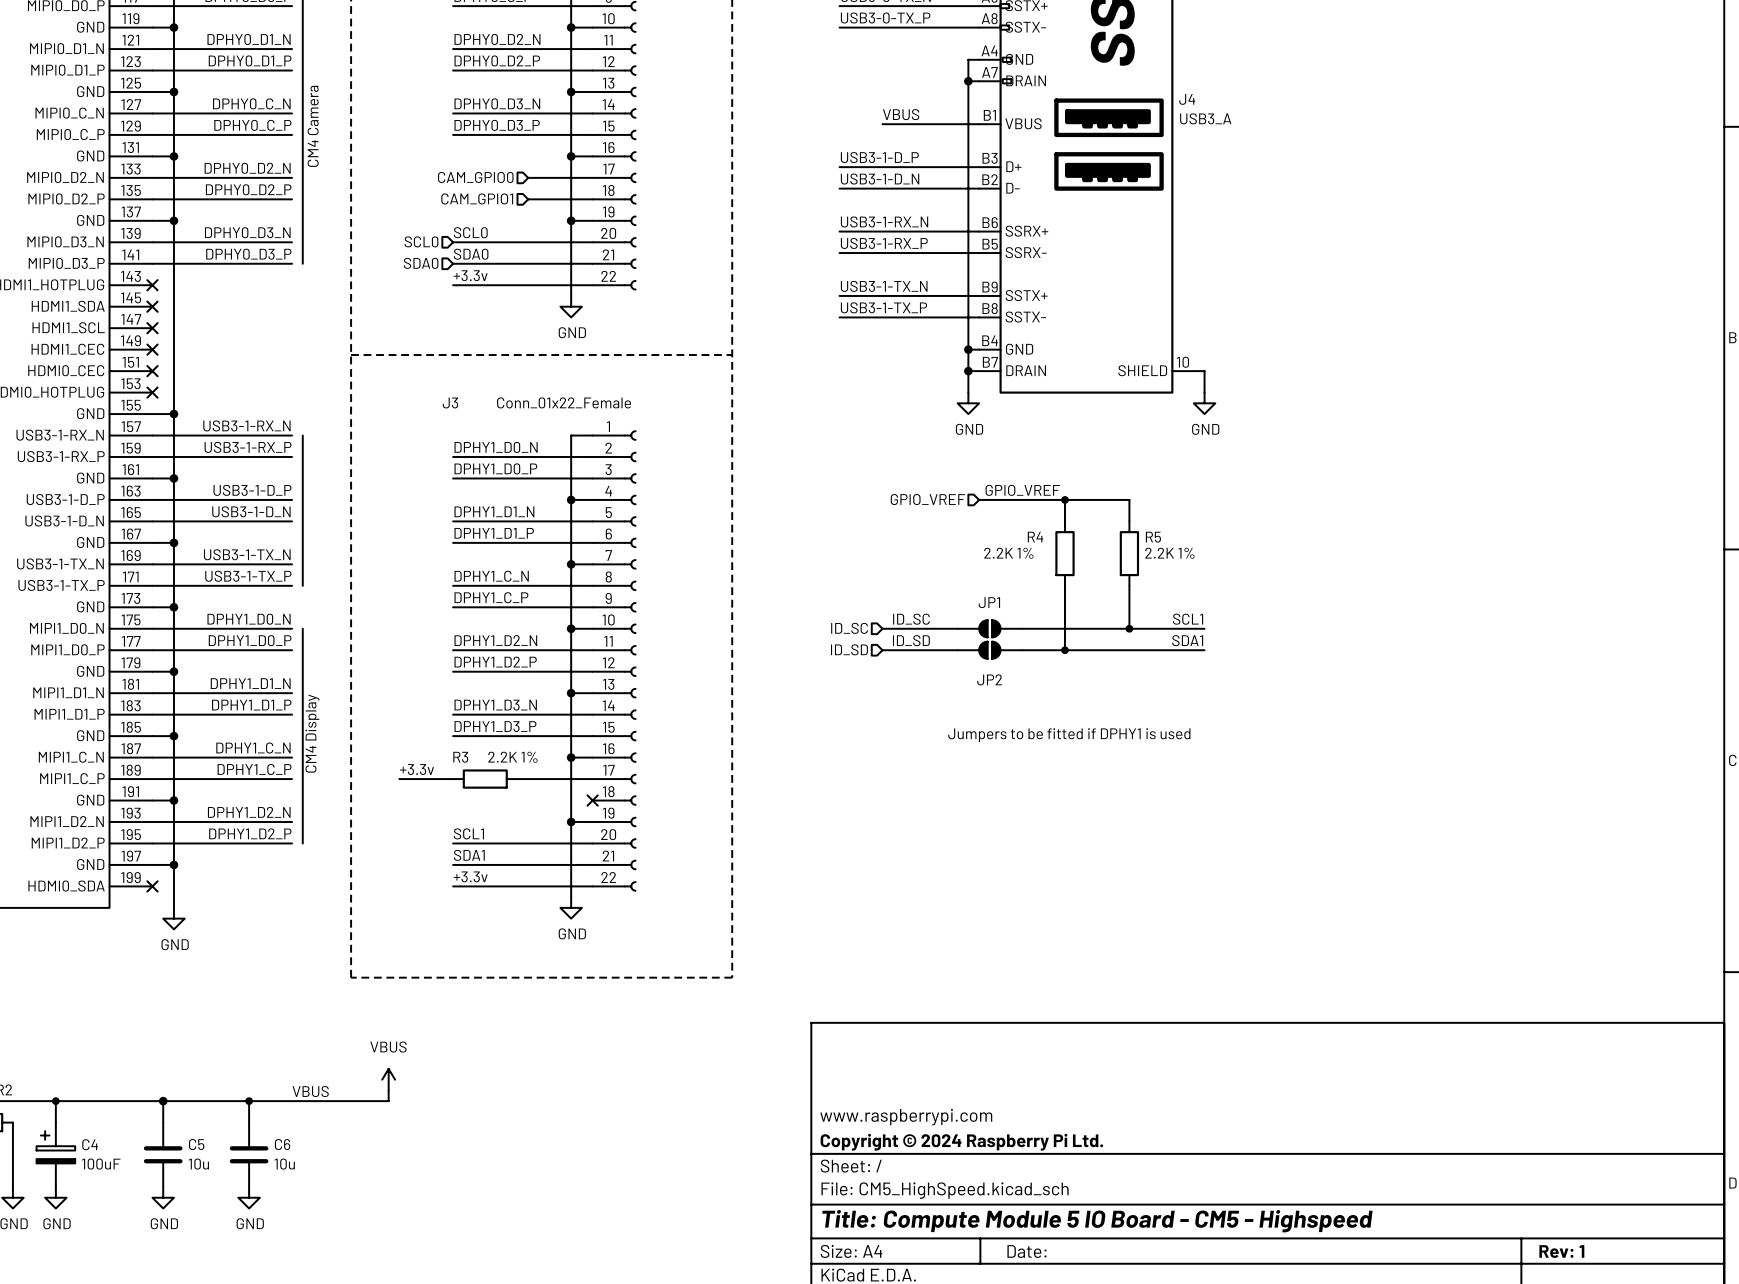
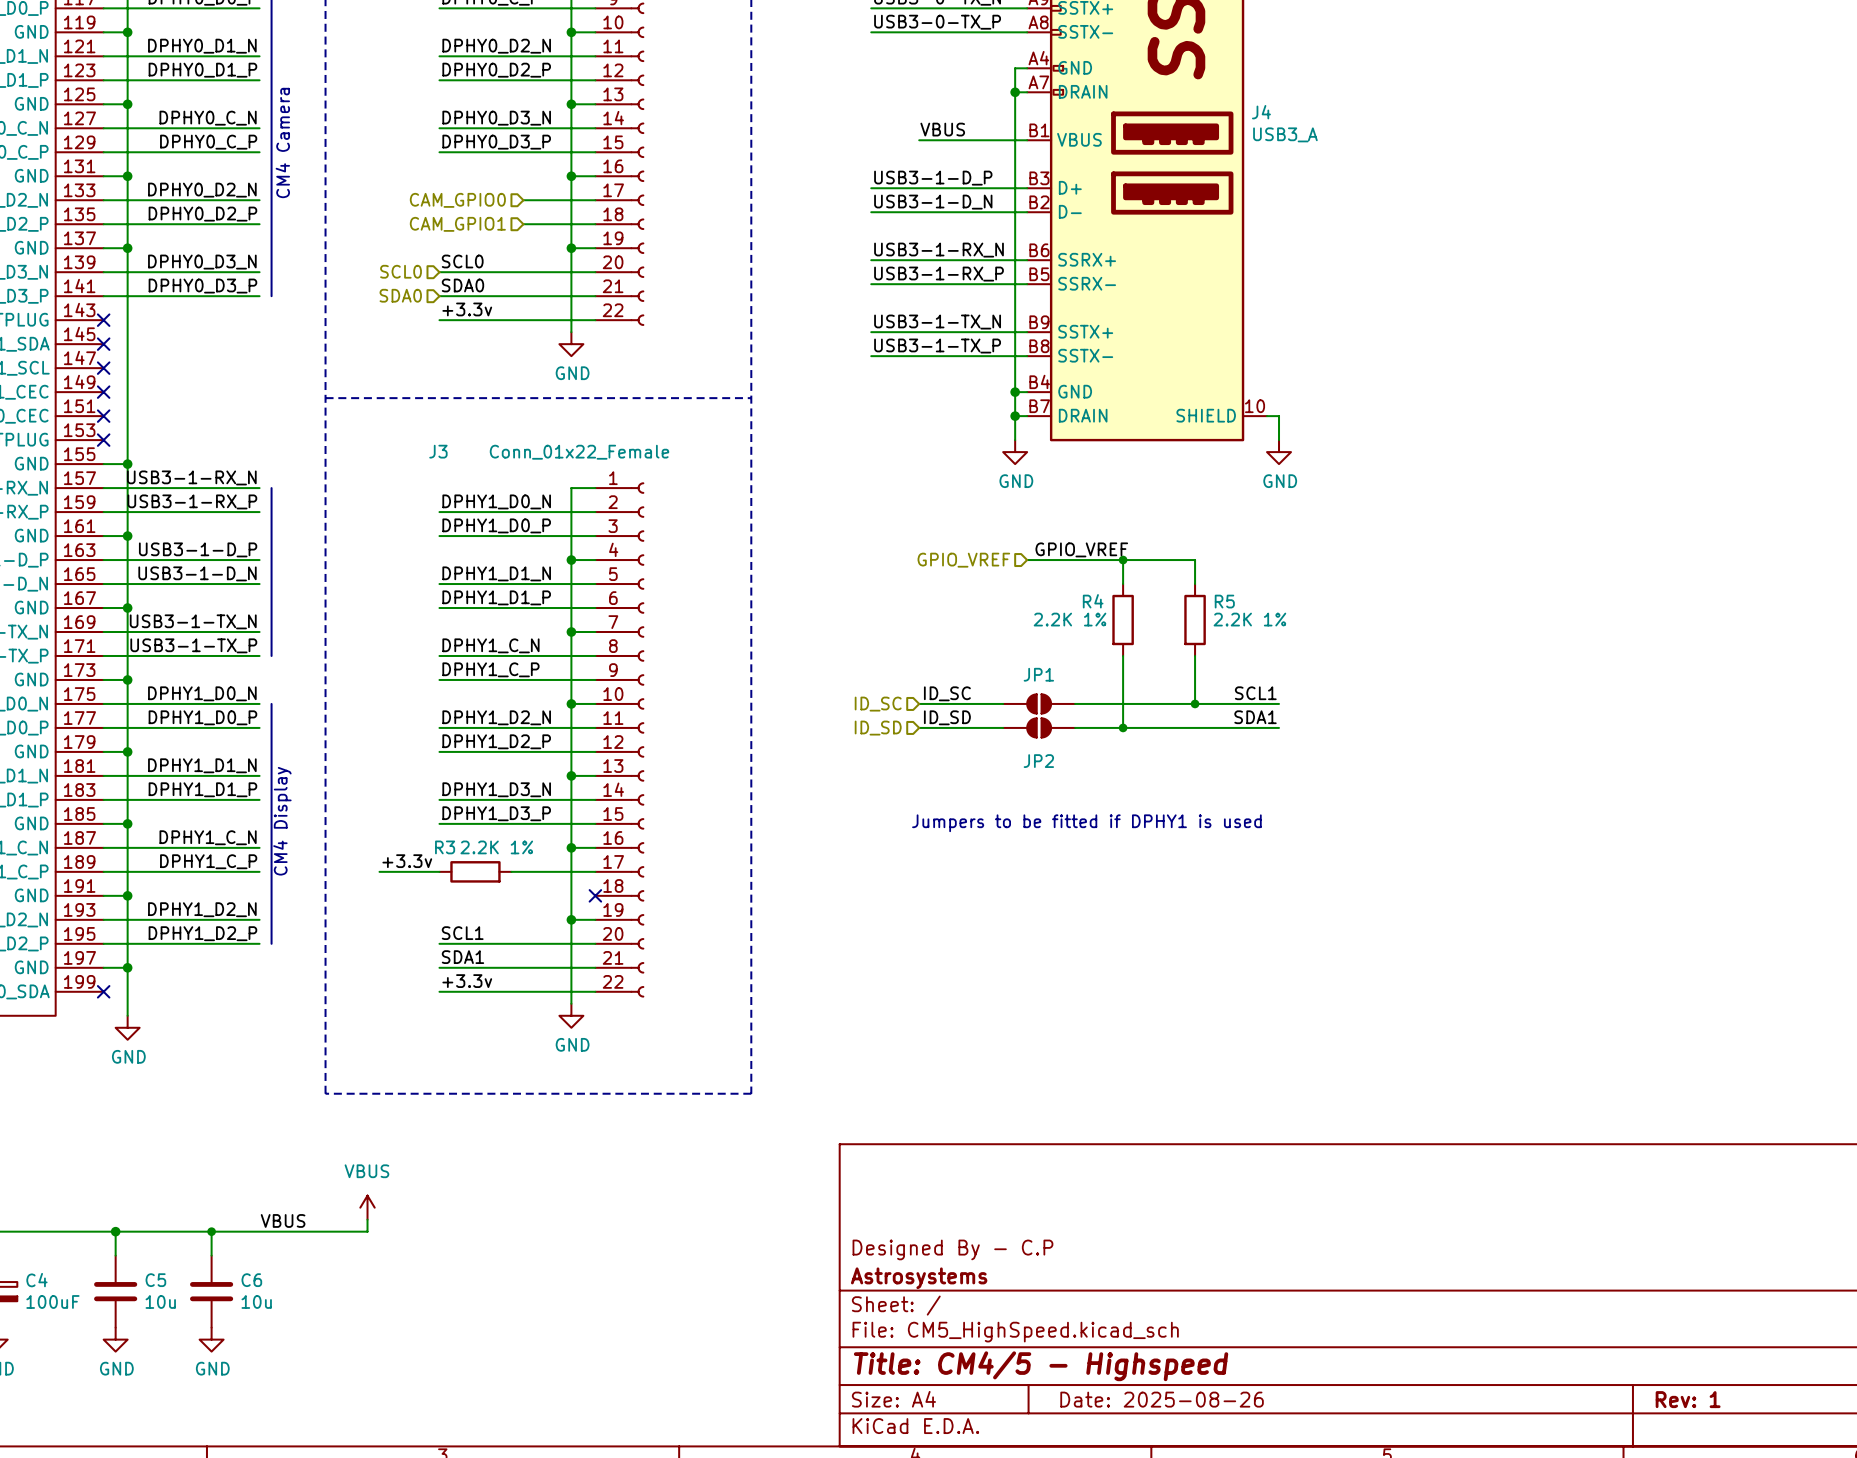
title block: www.raspberrypi.com (906, 1117) -> Designed By - C.P (952, 1249)
title block: Copyright © 2024 Raspberry Pi Ltd. (961, 1142) -> Astrosystems (919, 1278)
title block: Title: Compute Module 5 IO Board - CM5 - Highspeed (1097, 1221) -> Title: CM4/5 - Highspeed (1041, 1366)
title block: Date: (1026, 1251) -> Date: 2025-08-26 (1162, 1399)

